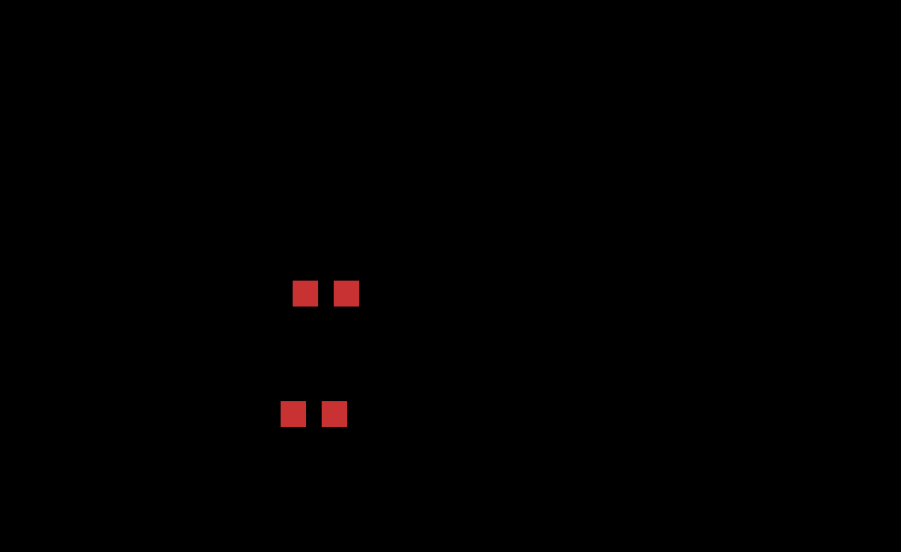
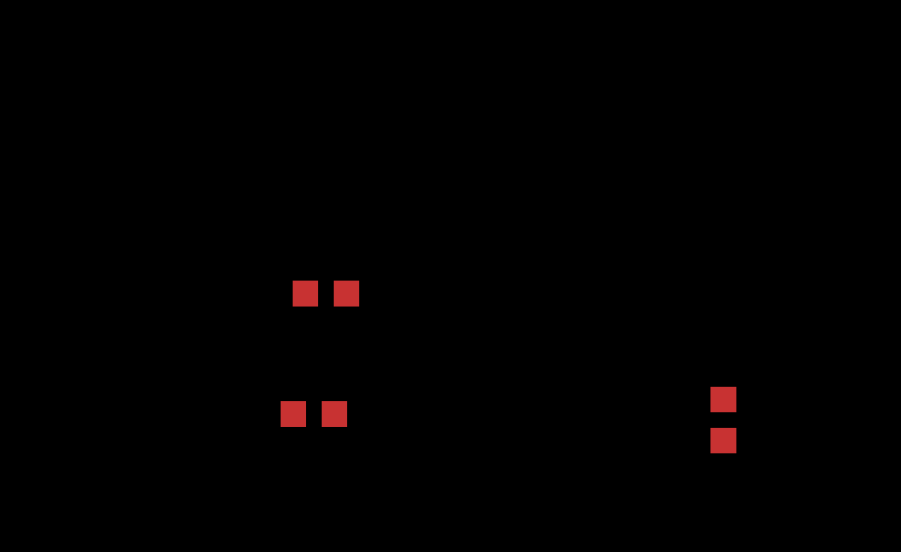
part: none -> (723, 420)

